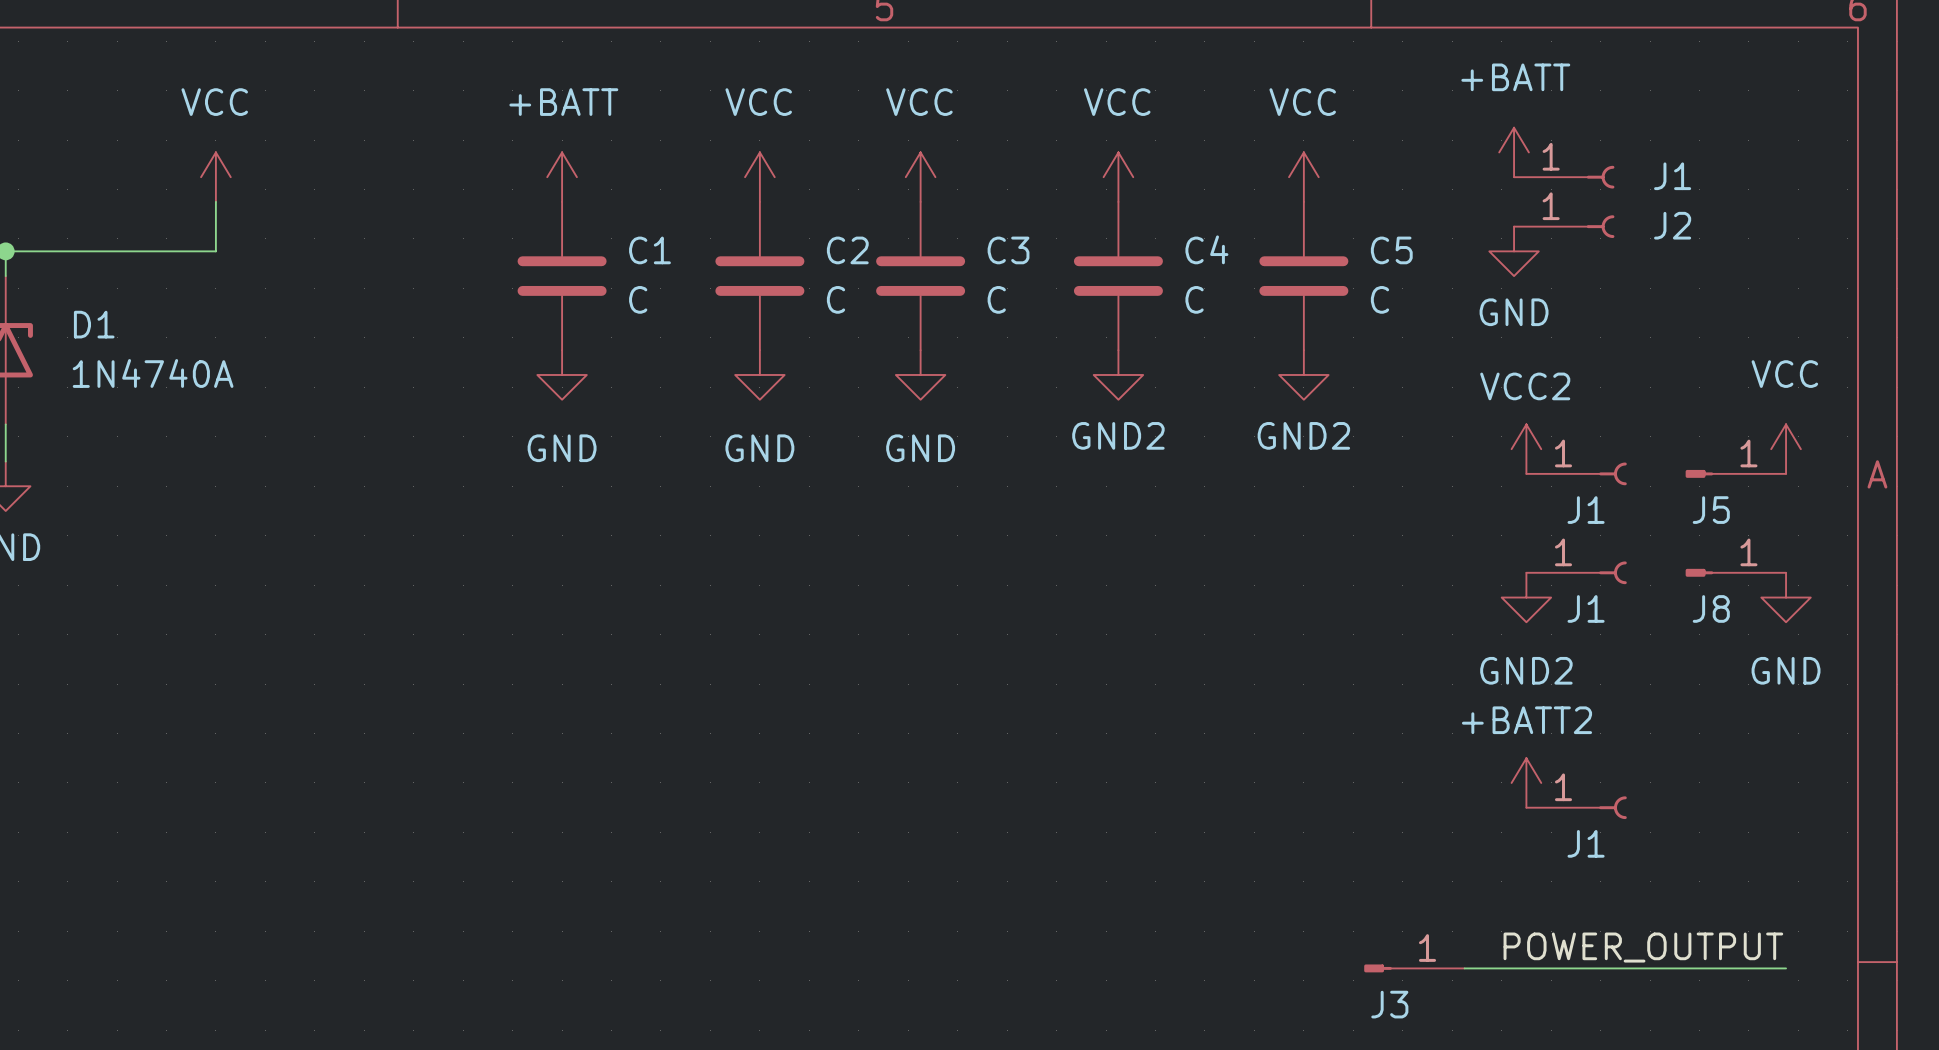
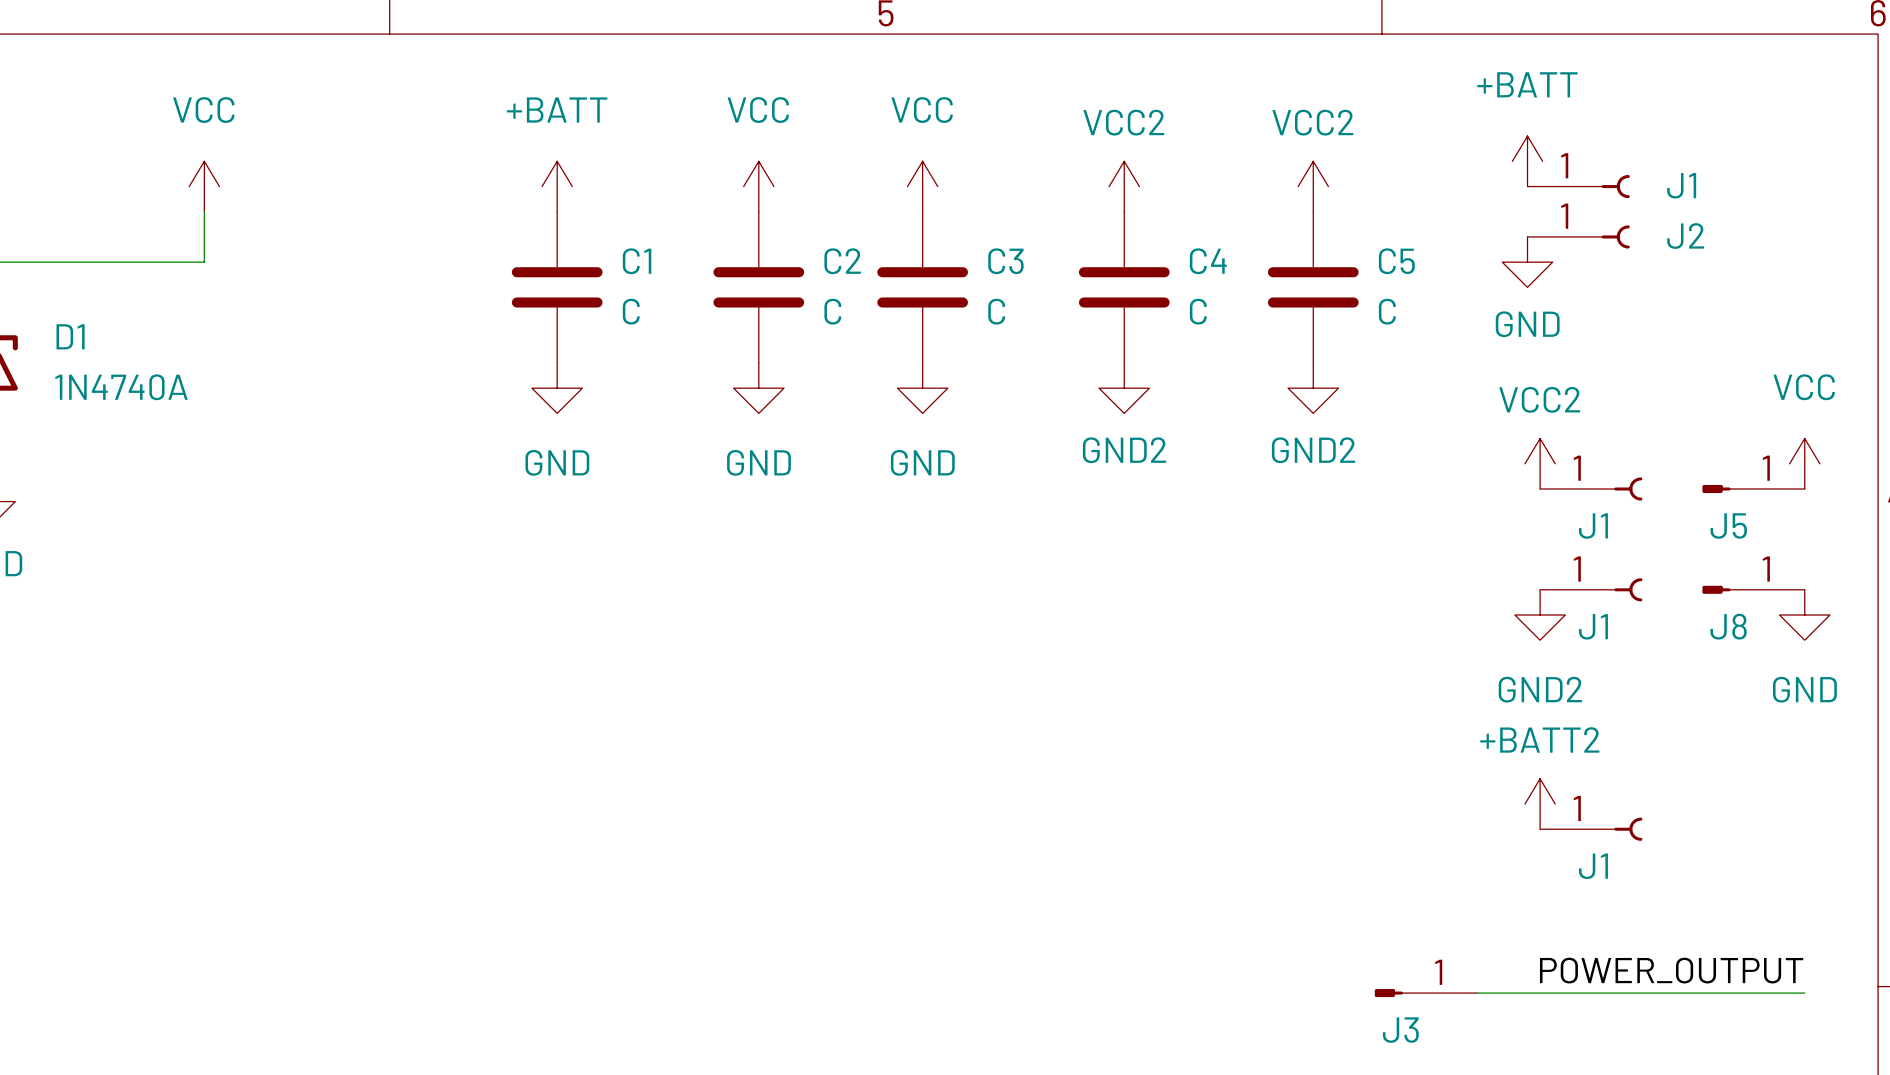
power symbol: VCC (1118, 177) -> VCC2 (1124, 186)
power symbol: VCC (1303, 177) -> VCC2 (1313, 186)

